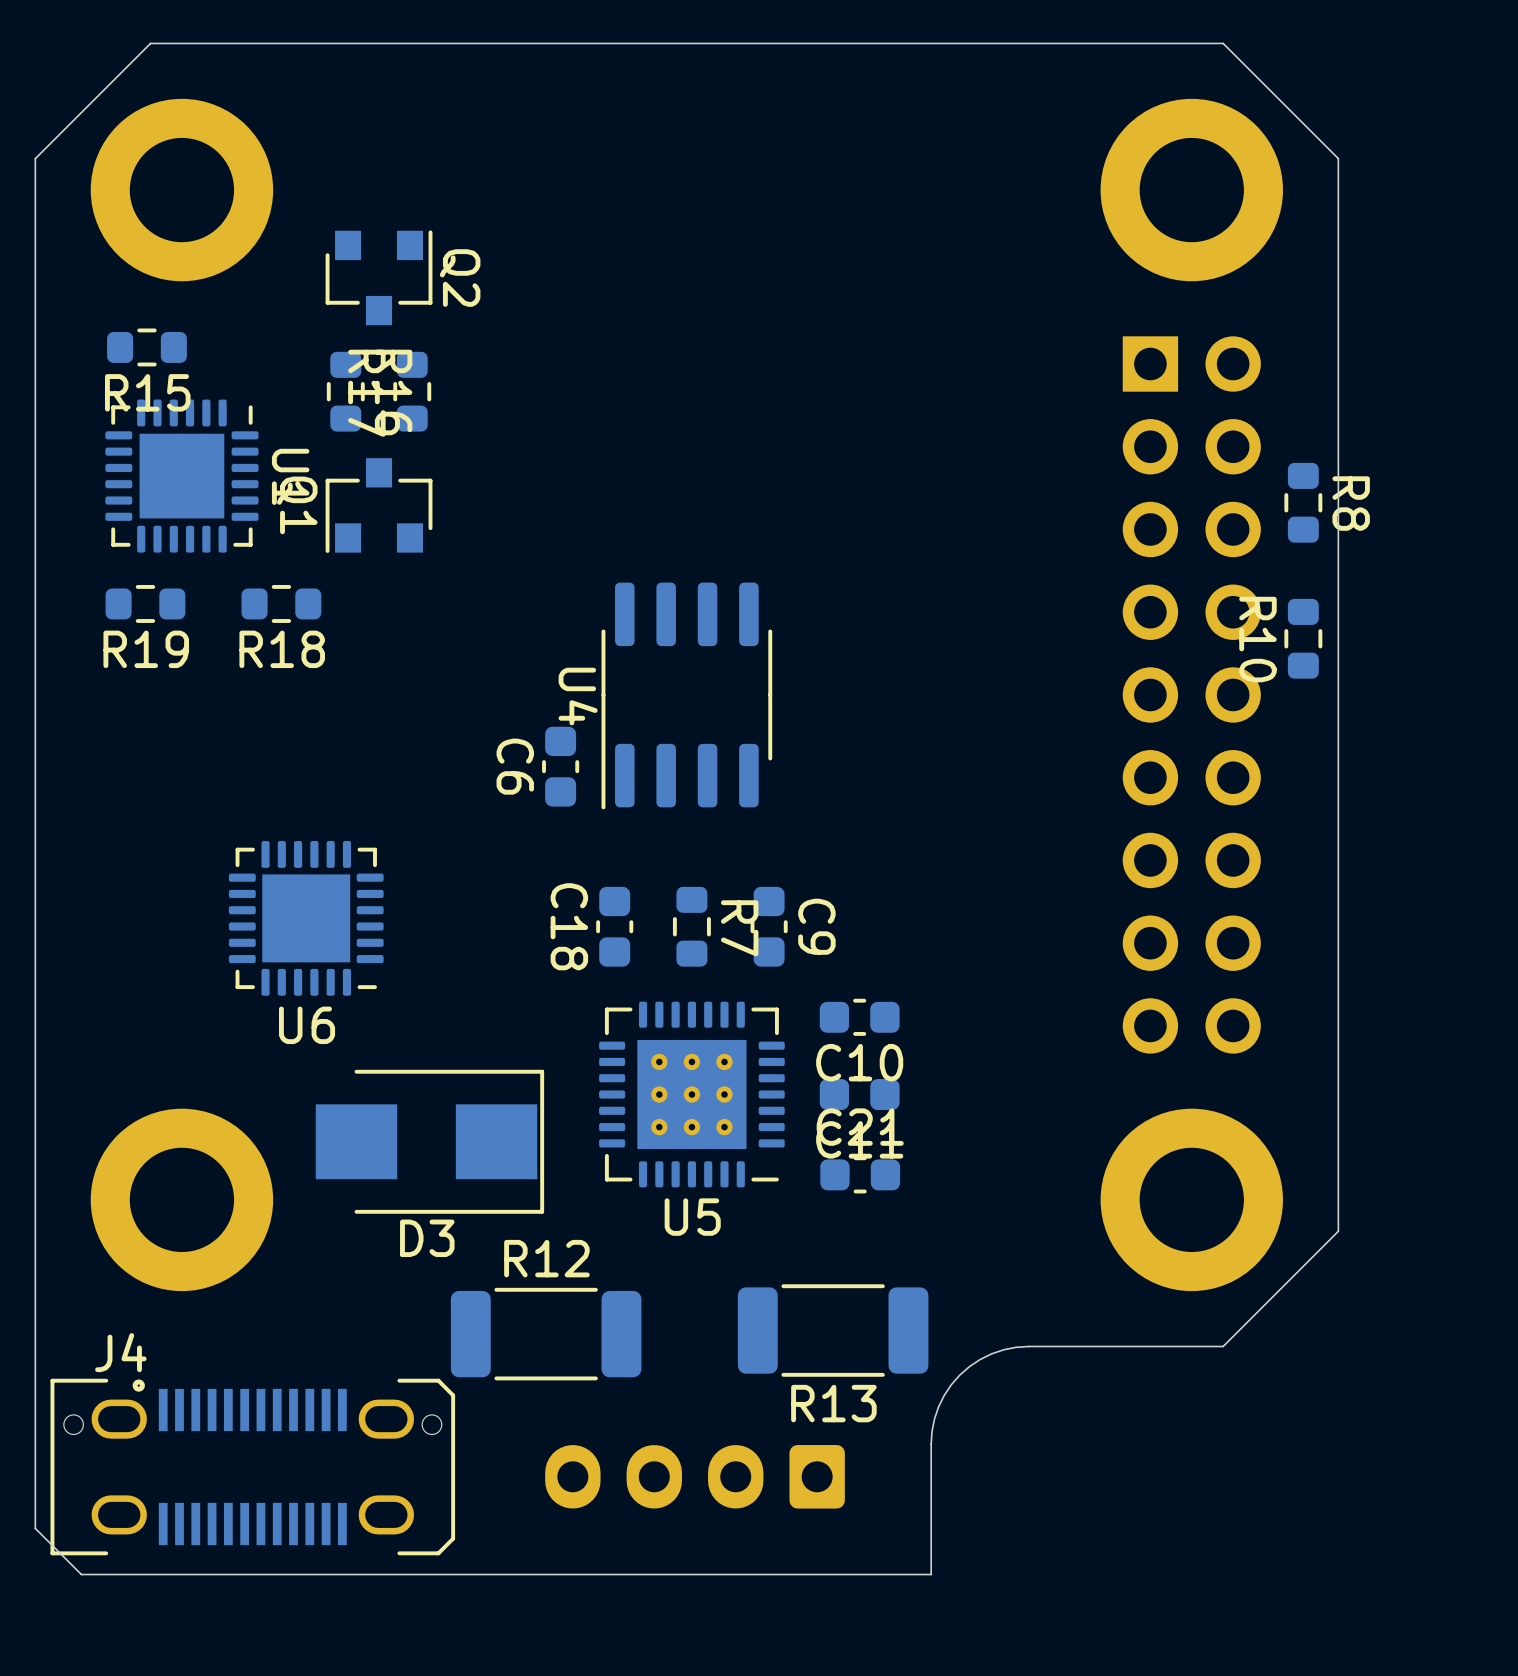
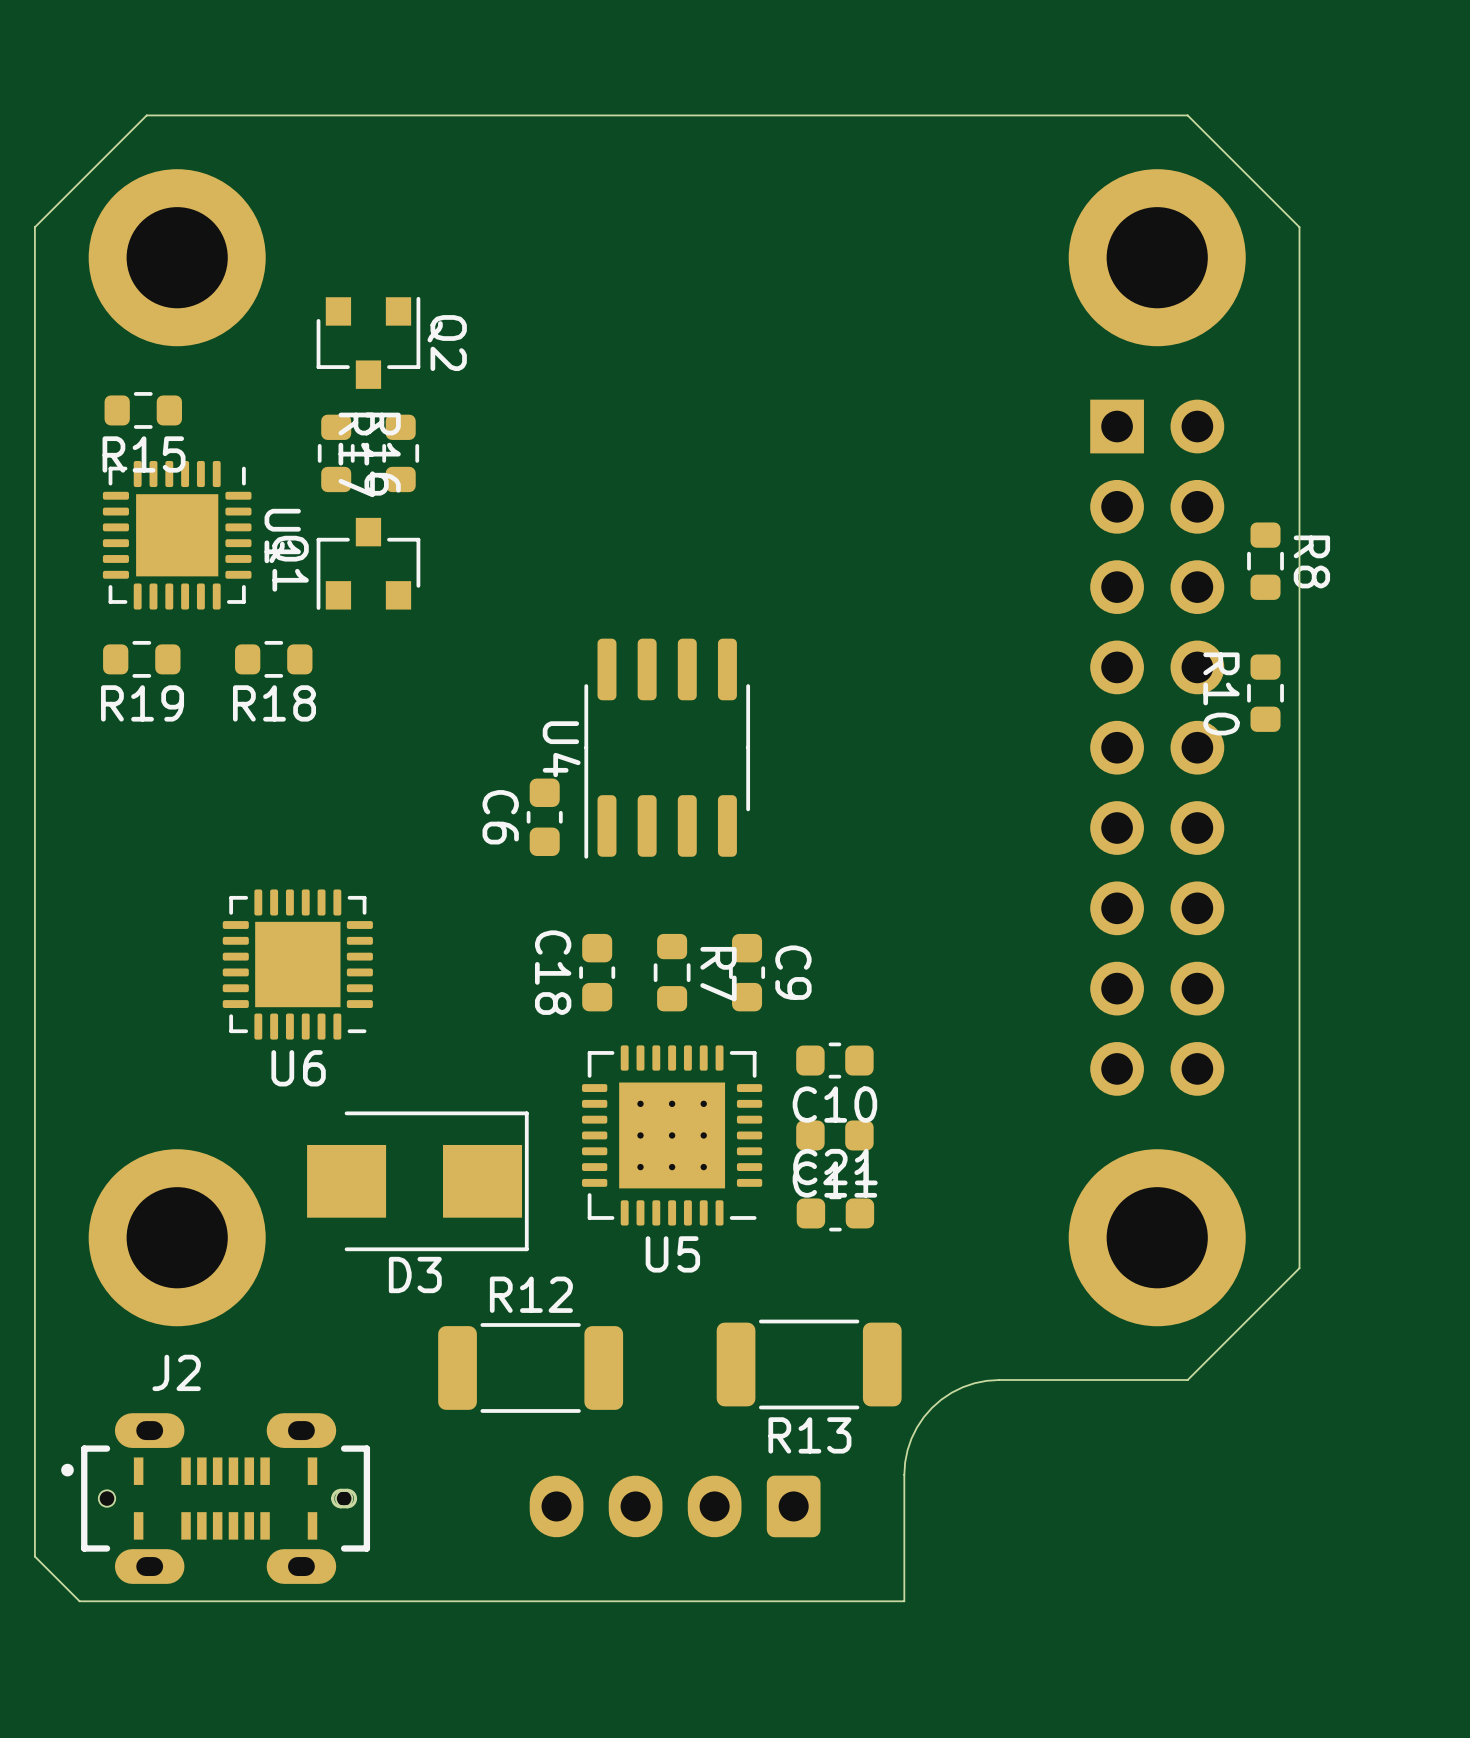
J4: (252, 1467) -> none
J2: none -> (215, 1498)

